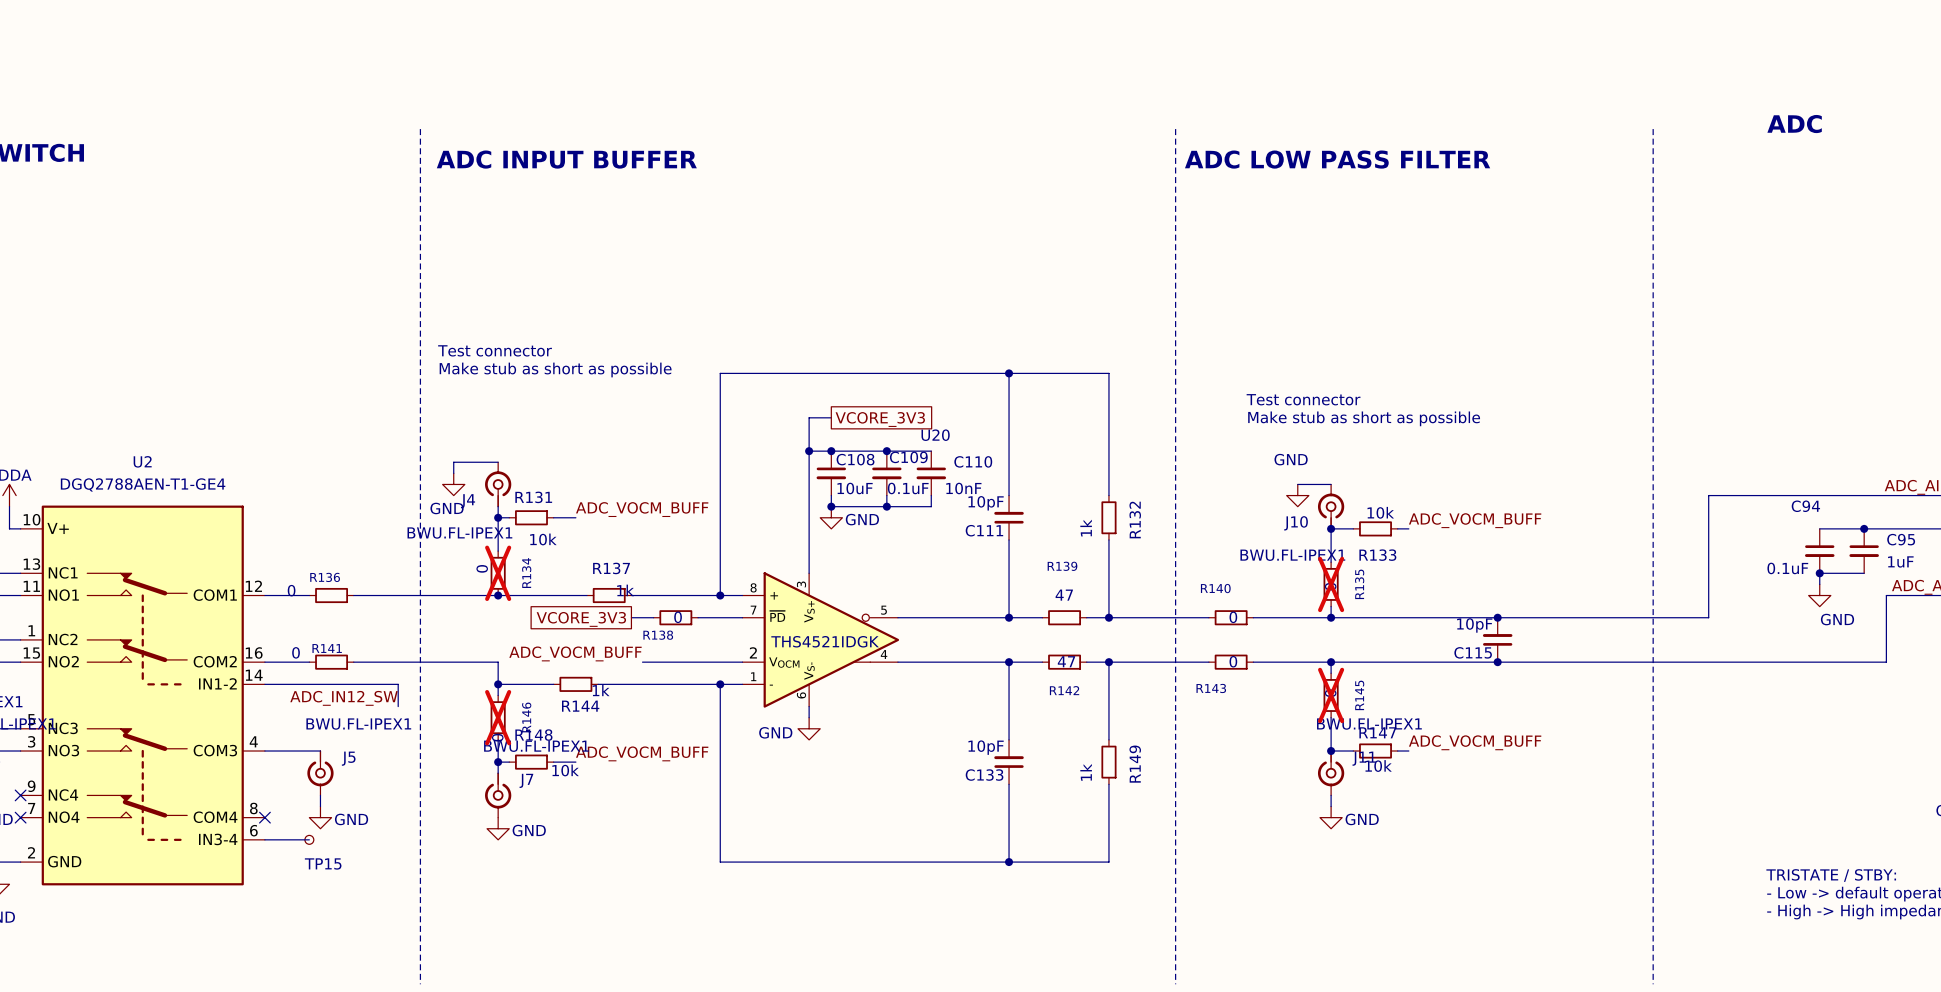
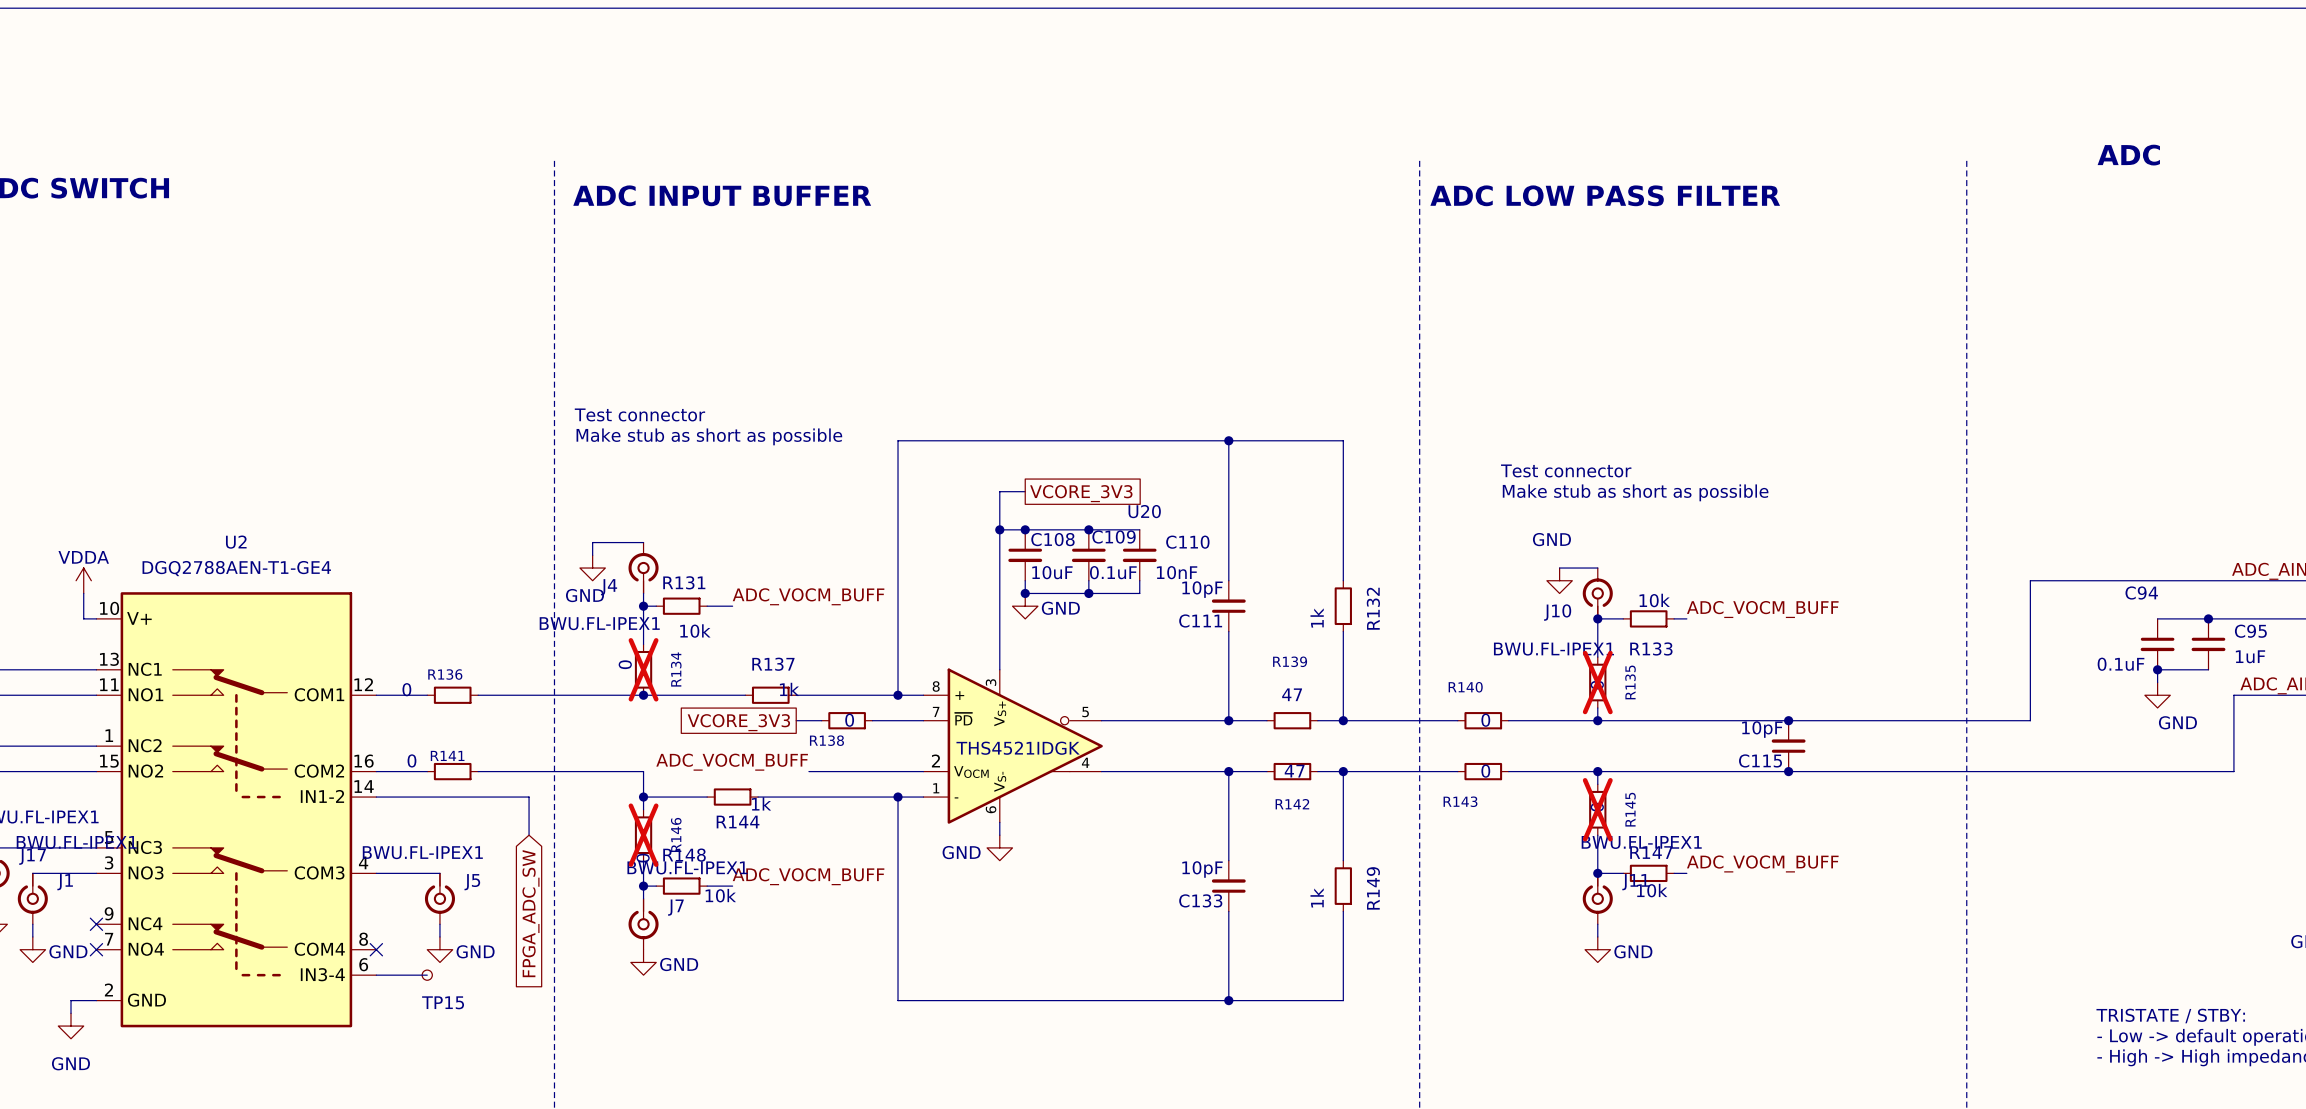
label: ADC_IN12_SW (344, 698) -> none
wire: none -> (529, 822) (529, 835)
J5 value position: BWU.FL-IPEX1 (358, 724) -> BWU.FL-IPEX1 (422, 852)
global label: none -> FPGA_ADC_SW (530, 913)

